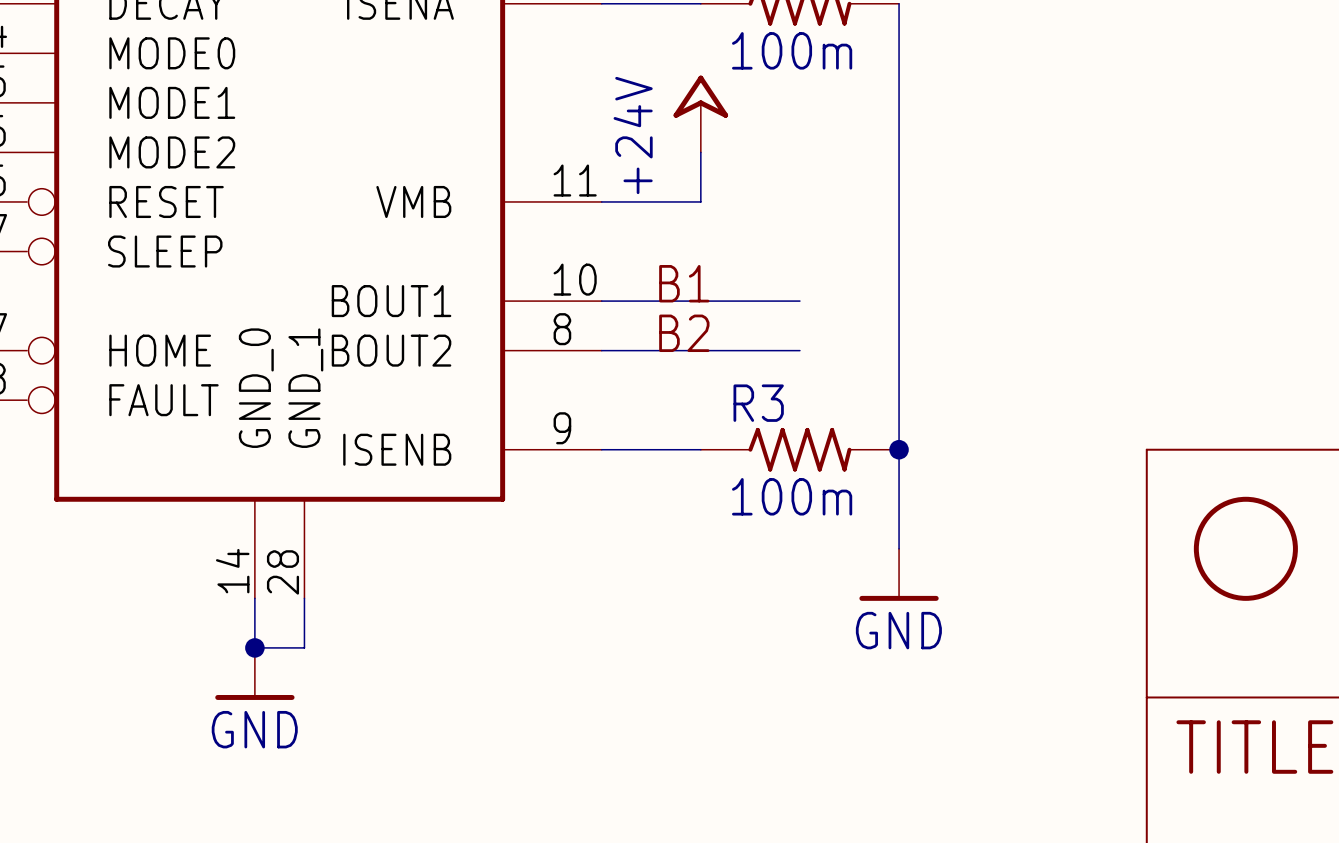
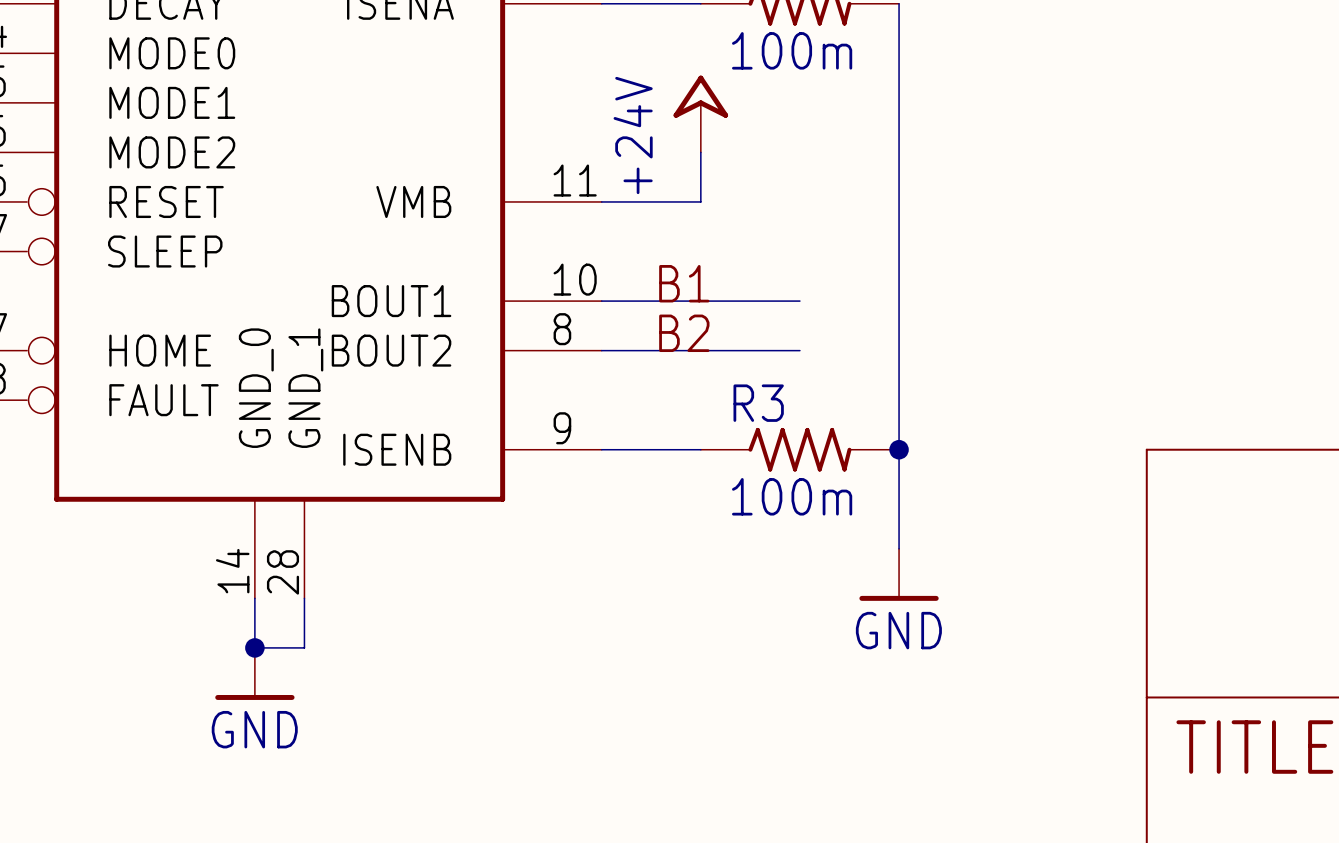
part: (1245, 548) -> none

